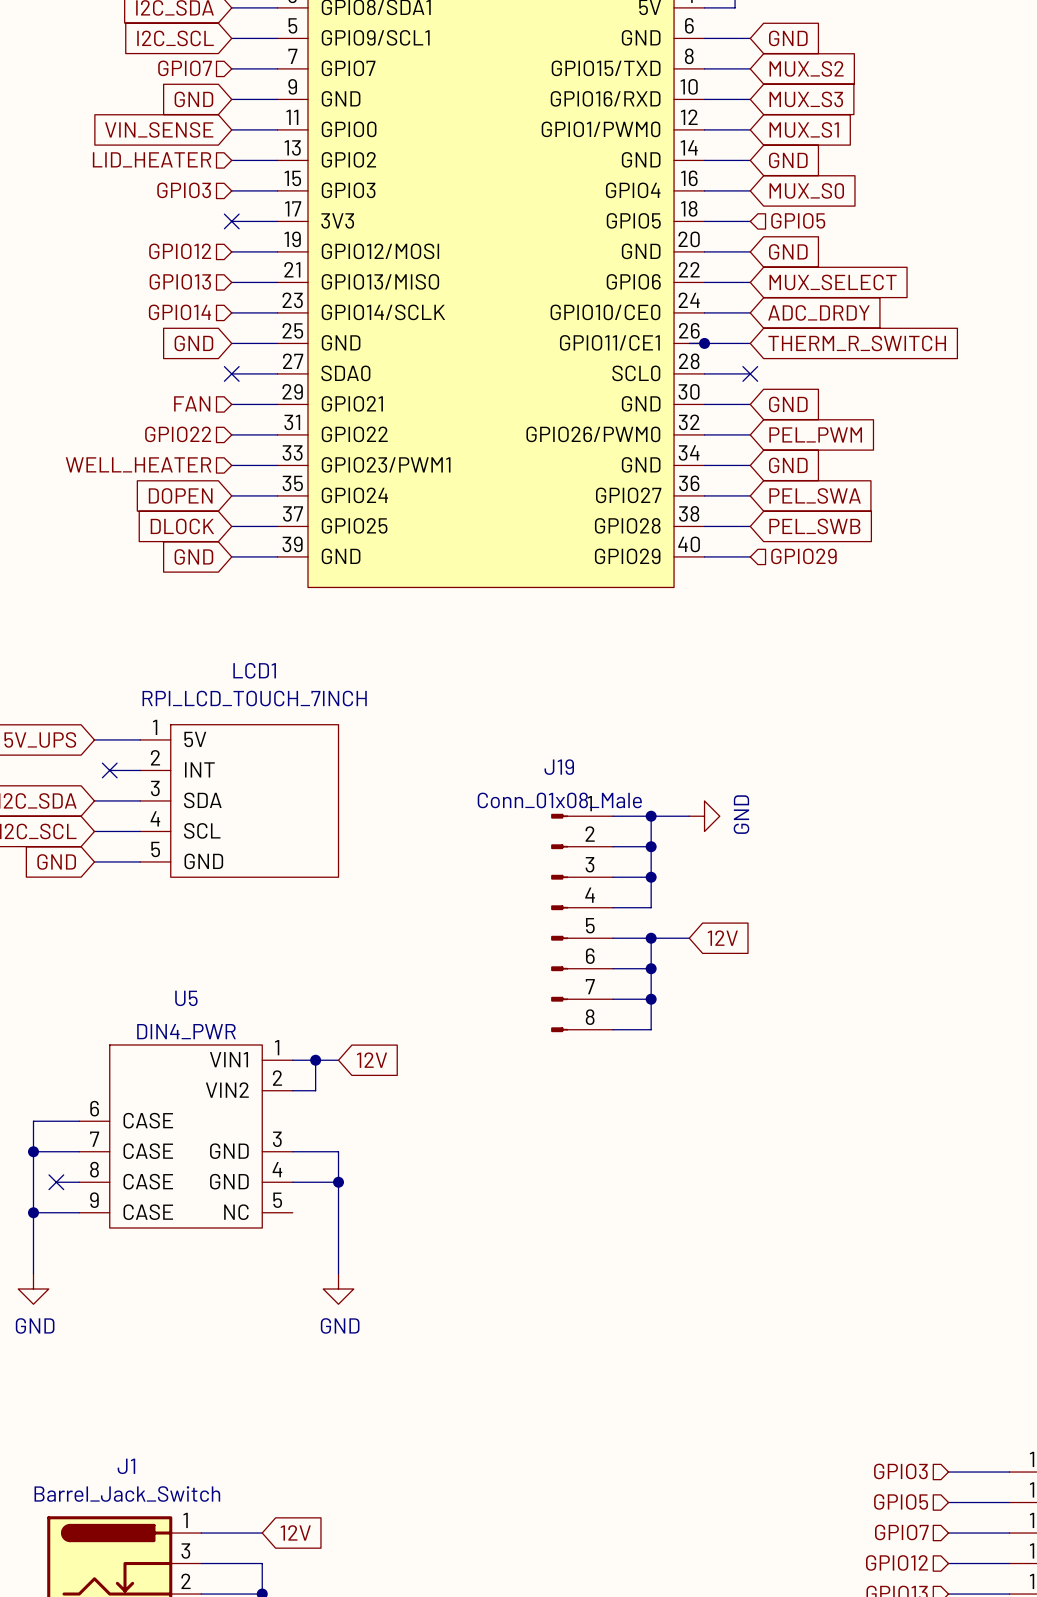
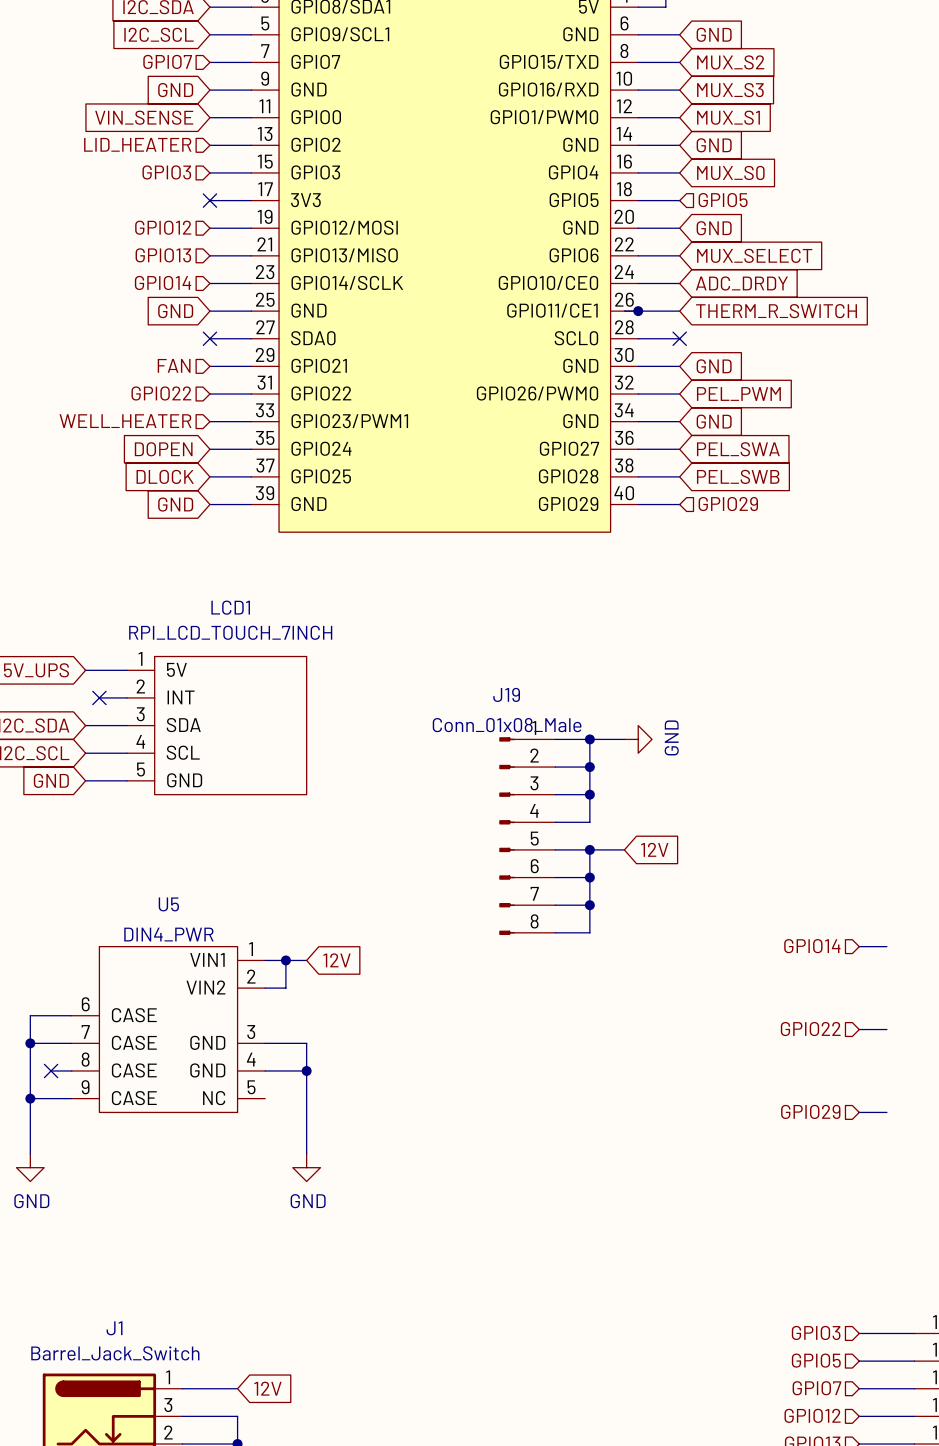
hierarchical label: none -> GPIO14 (812, 946)
wire: none -> (859, 946) (886, 946)
hierarchical label: none -> GPIO22 (810, 1029)
wire: none -> (859, 1029) (886, 1029)
hierarchical label: none -> GPIO29 (810, 1111)
wire: none -> (859, 1112) (886, 1112)

